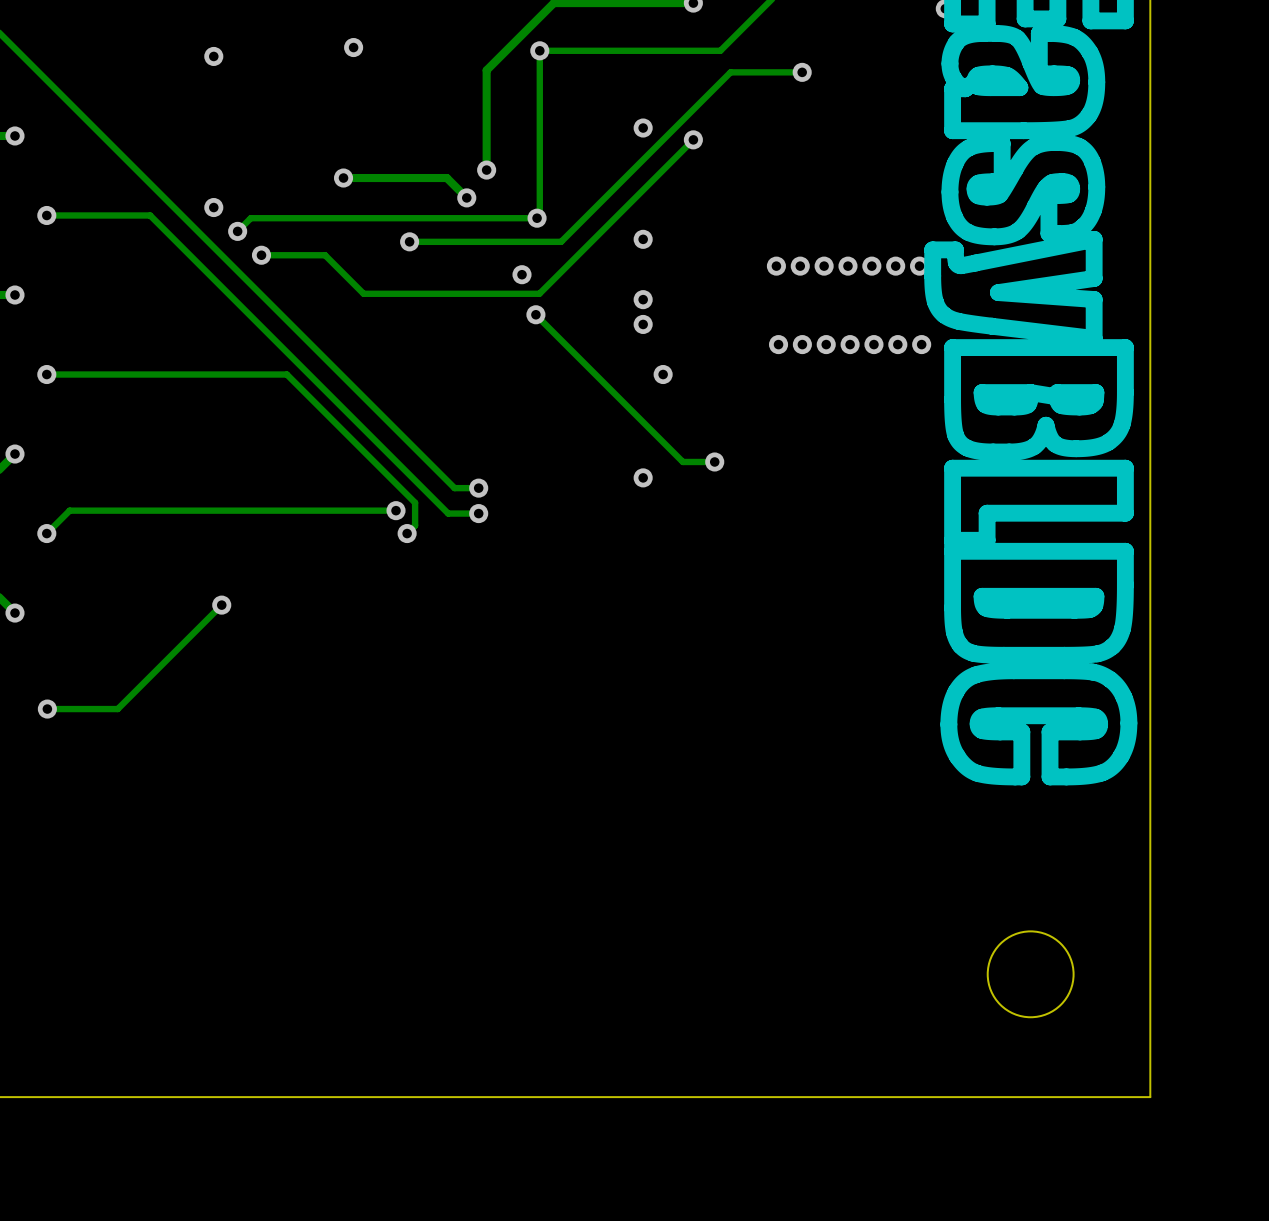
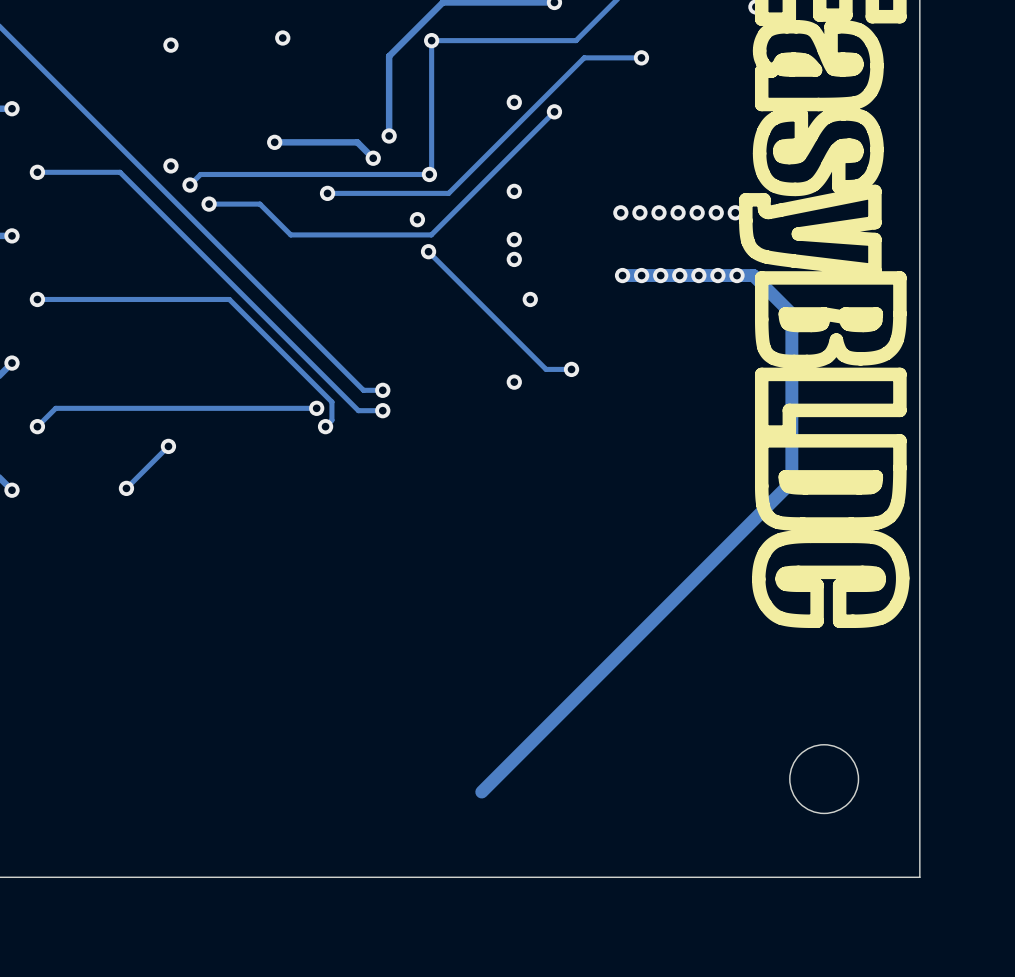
track: none -> (622, 275) (753, 275) (791, 313) (791, 481) (481, 792)
track: none -> (168, 446) (126, 488)
via: none -> (168, 446)
track: (221, 605) (117, 709) (47, 708) -> none
via: (221, 605) -> none
via: none -> (126, 488)
via: (47, 709) -> none

